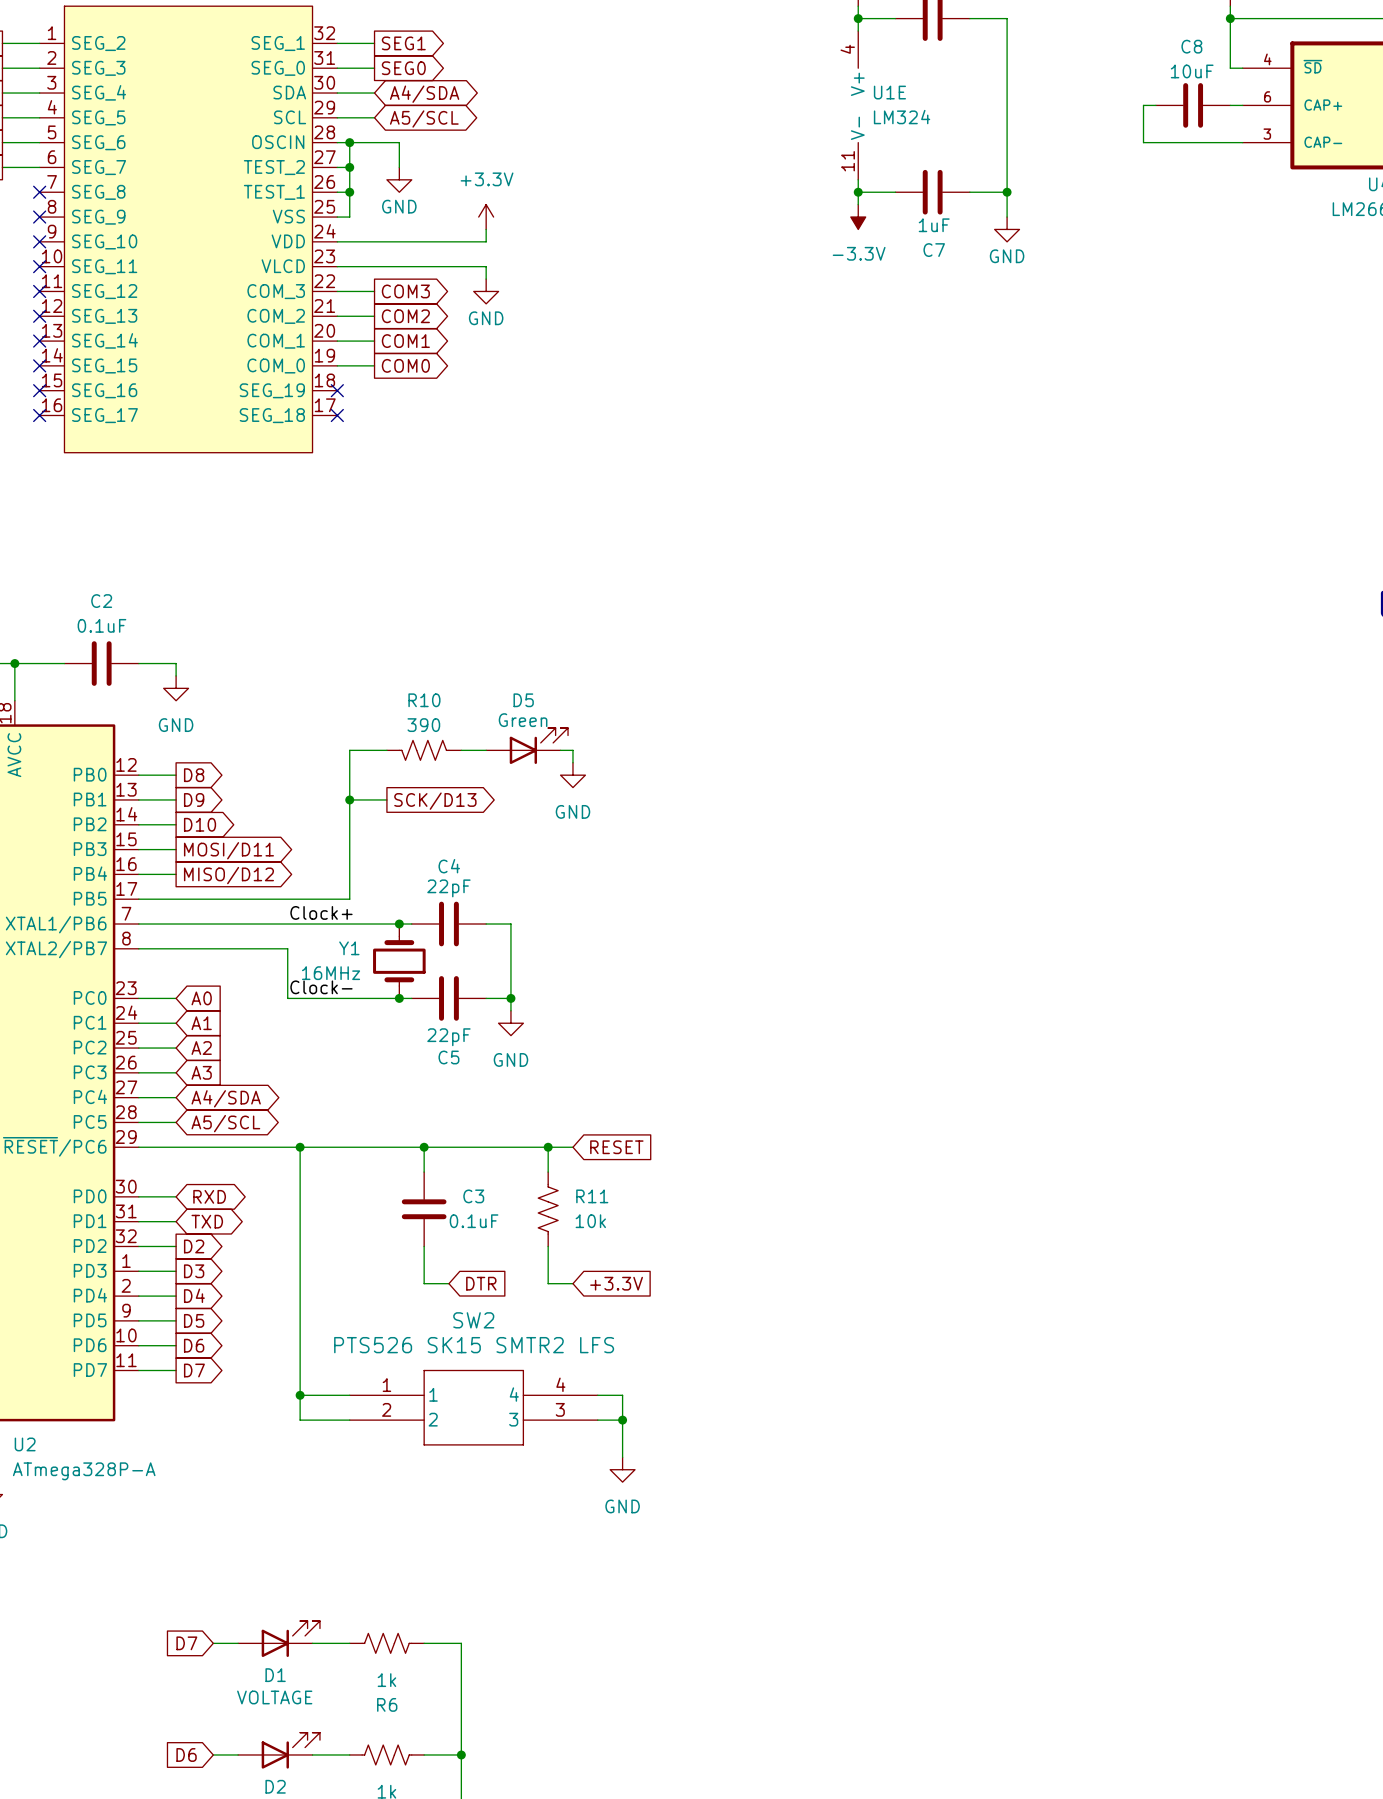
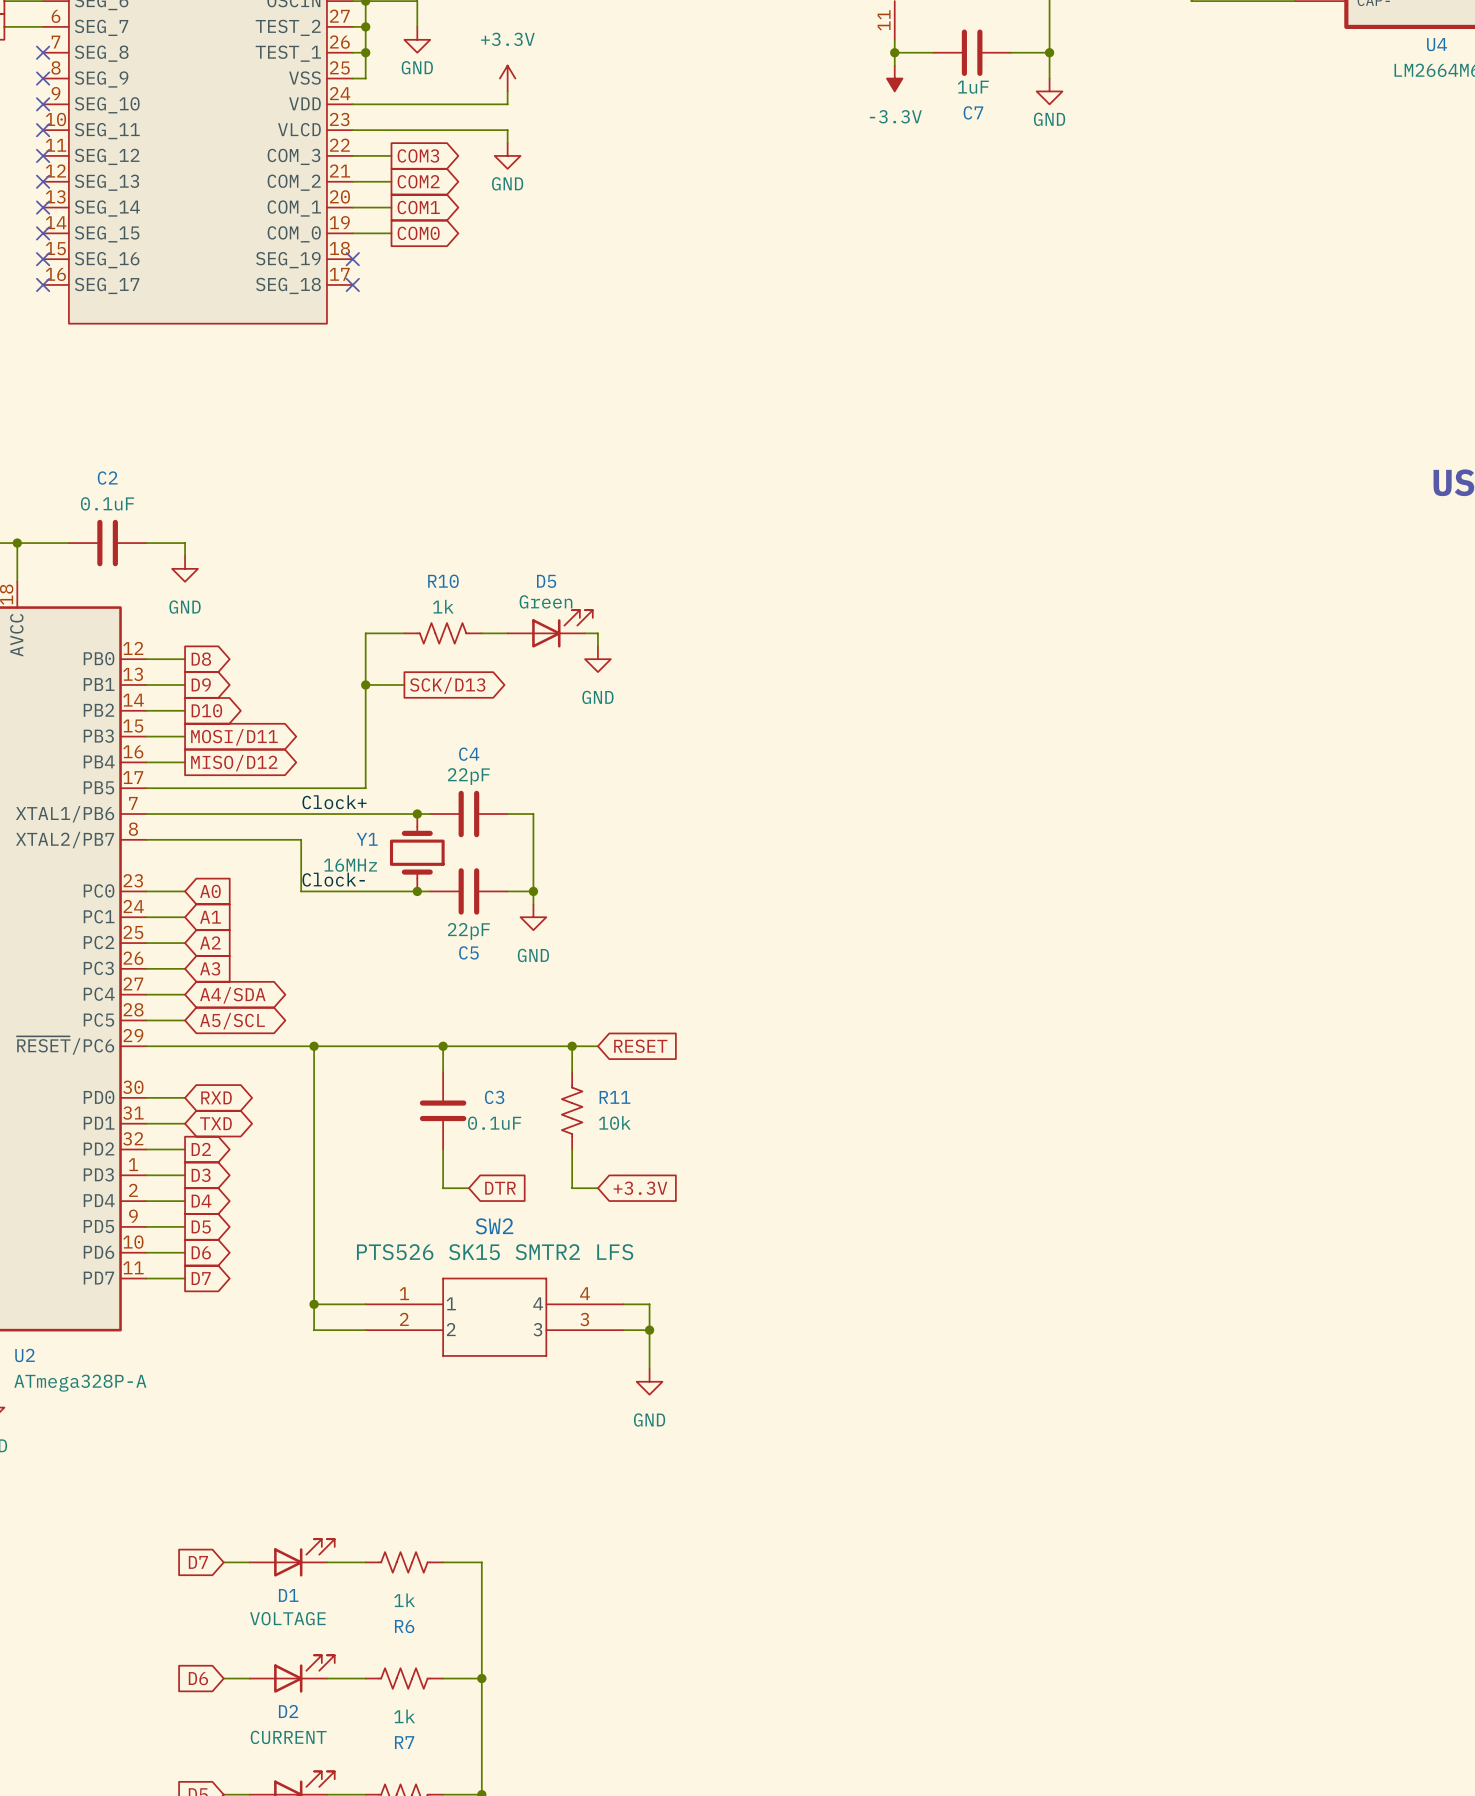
R10 value: 390 (423, 725) -> 1k (443, 606)

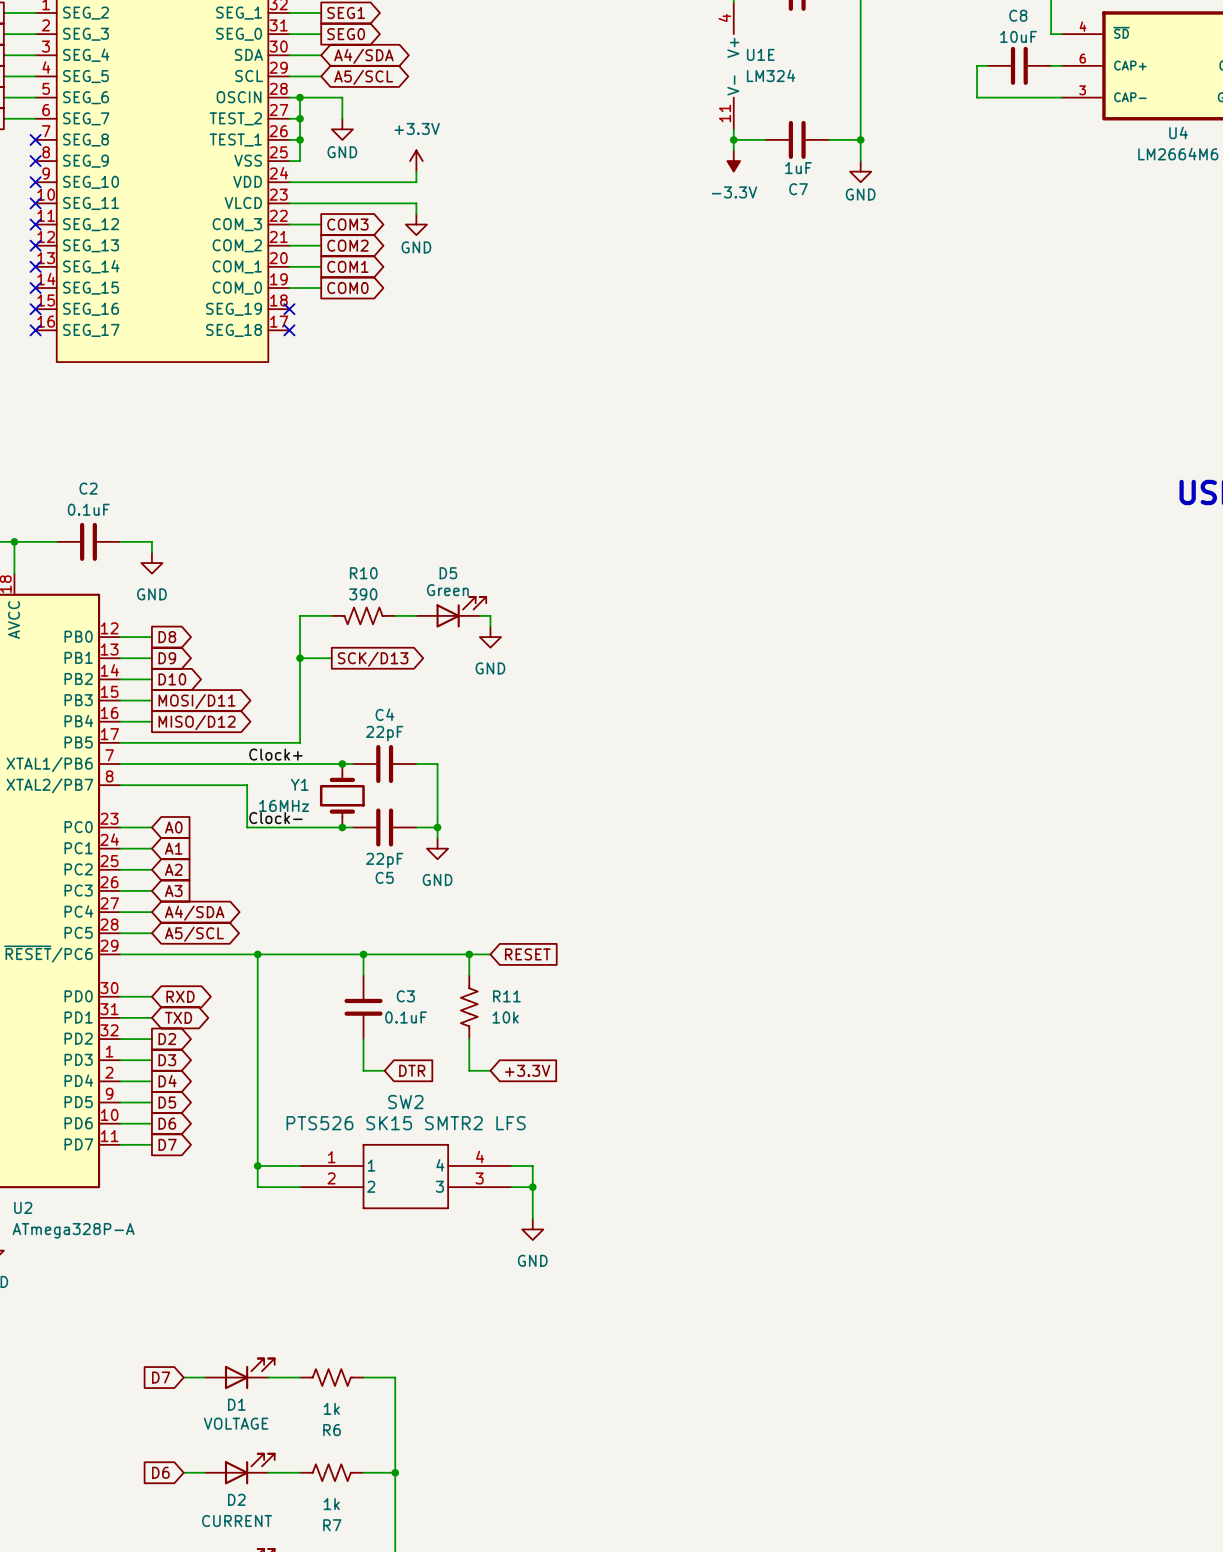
R10 value: 1k (443, 606) -> 390 (363, 594)

